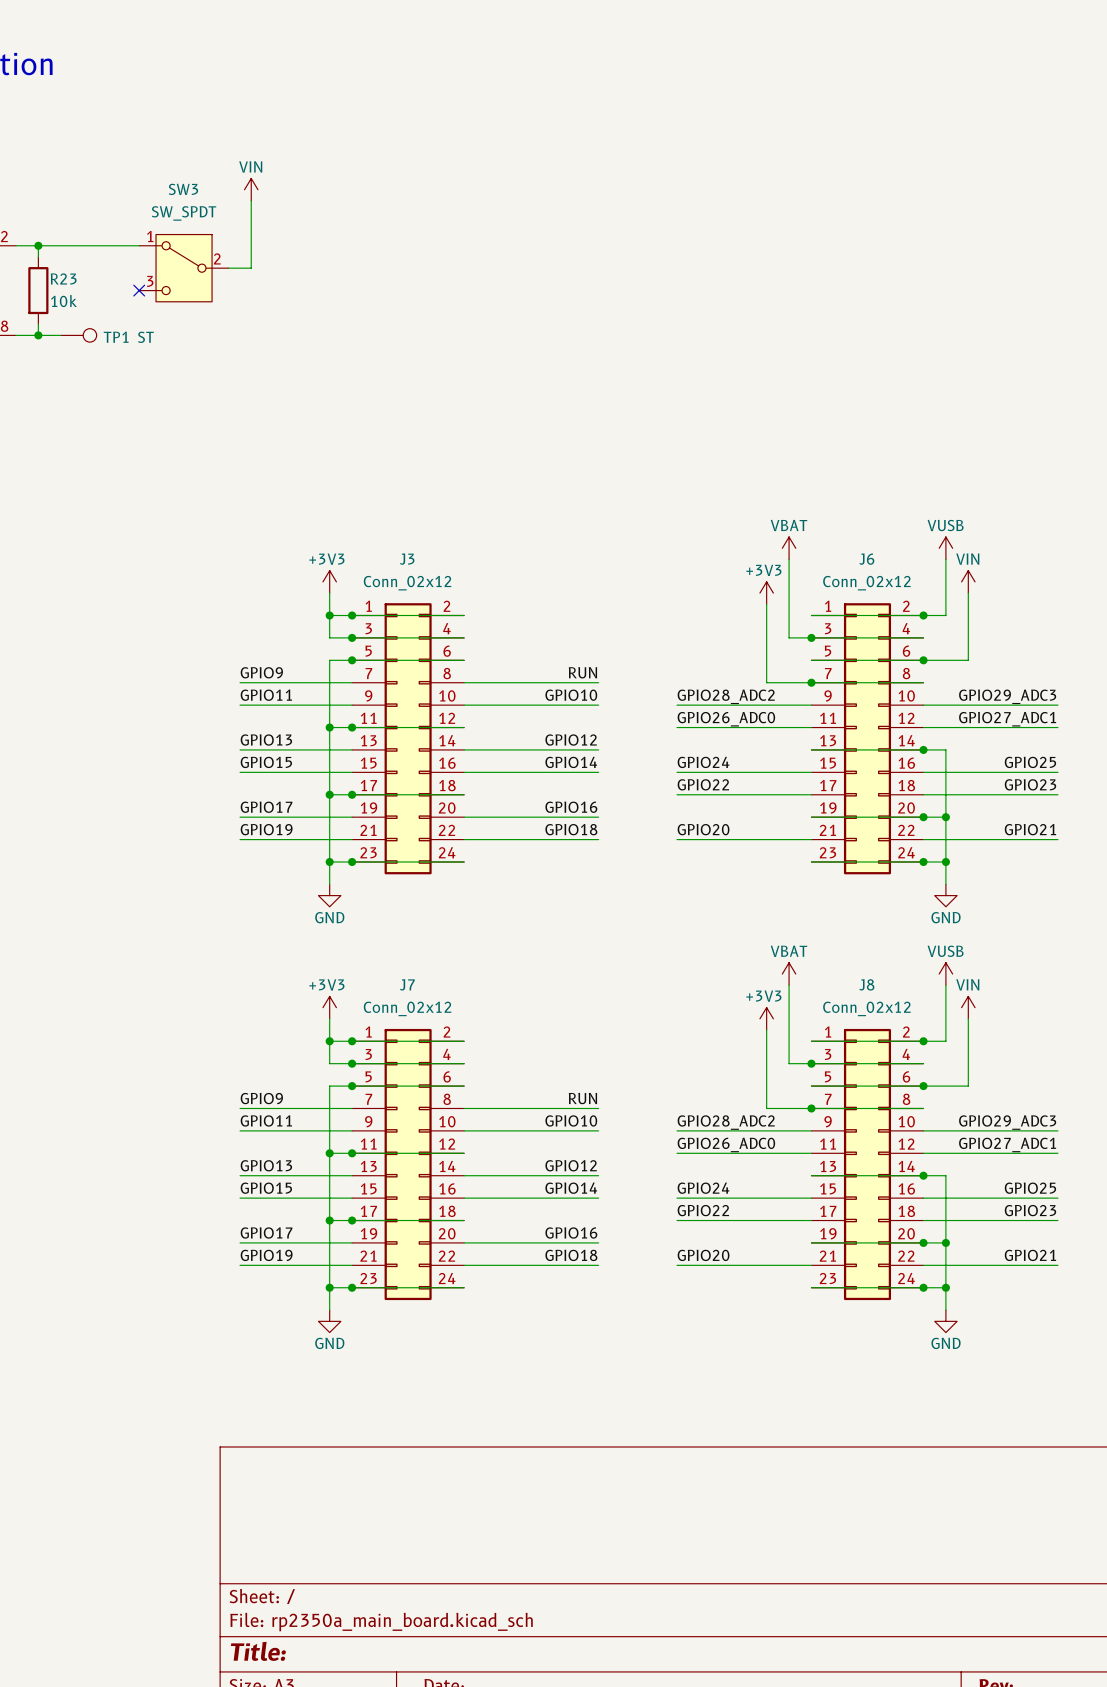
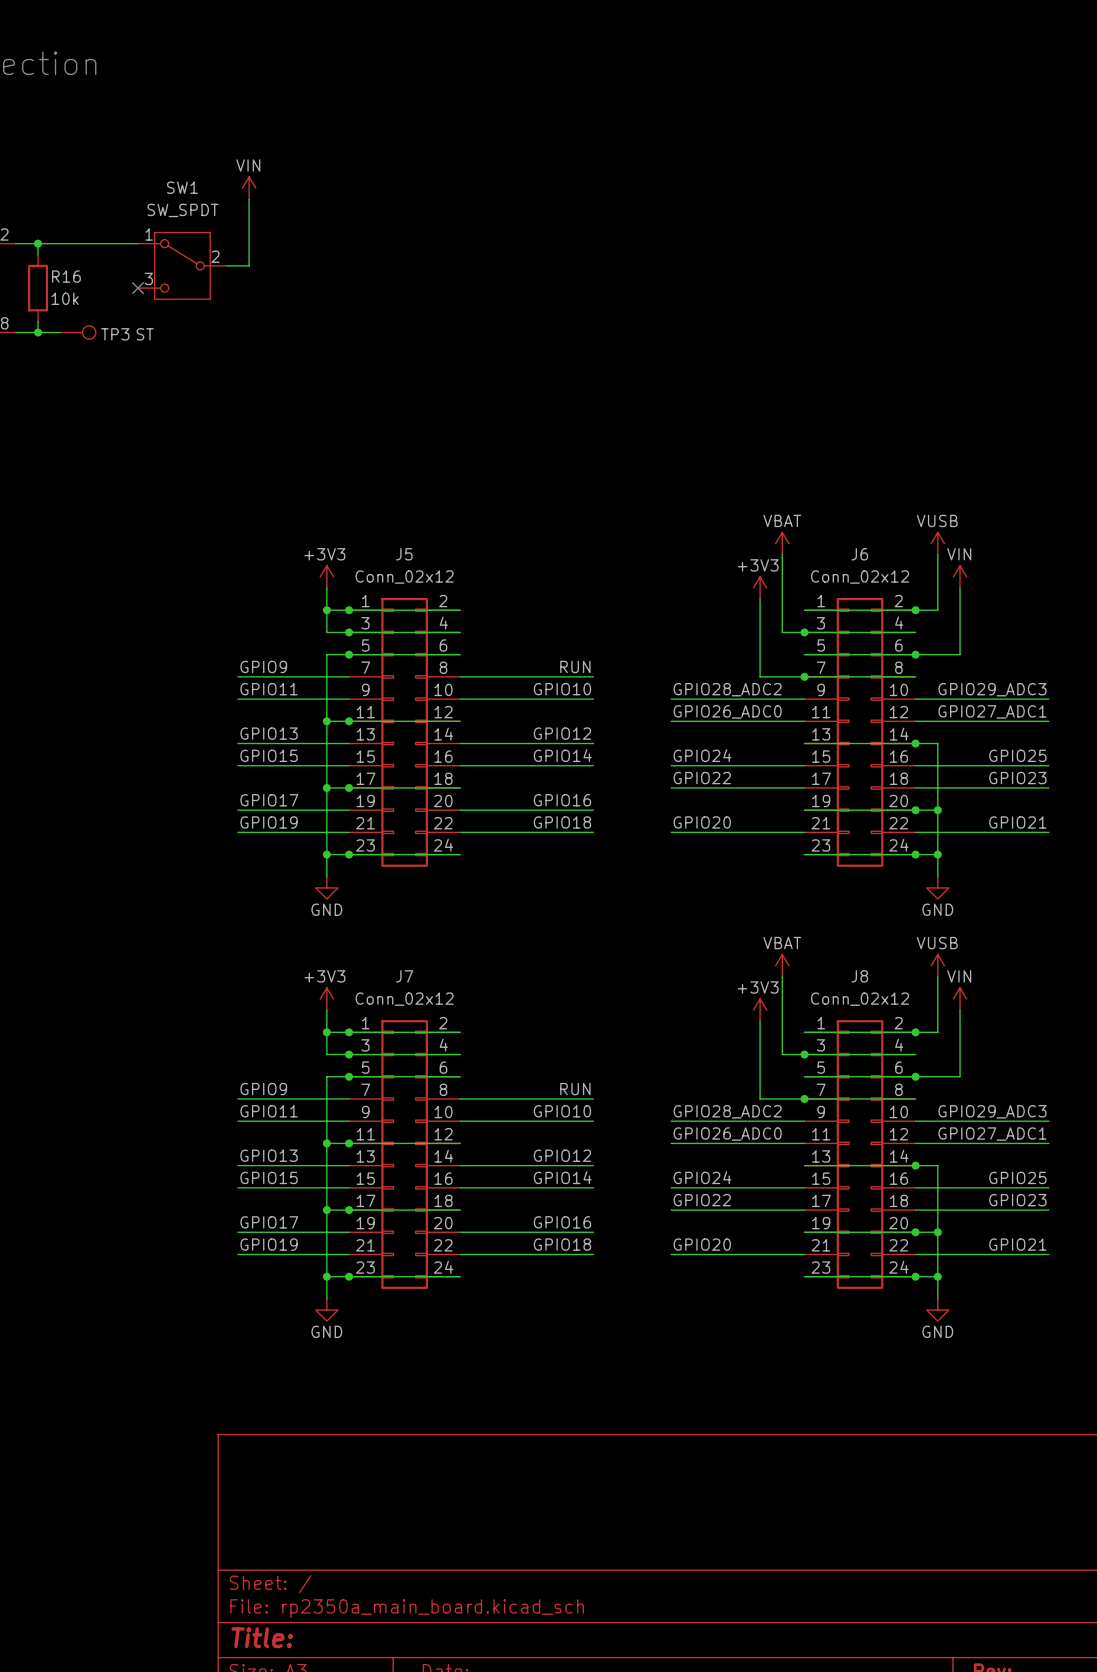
SW3 name: SW3 (183, 189) -> SW1 (182, 187)
R23 name: R23 (63, 278) -> R16 (66, 276)
TP1 name: TP1 (116, 337) -> TP3 (115, 334)
J3 name: J3 (407, 559) -> J5 (404, 554)

